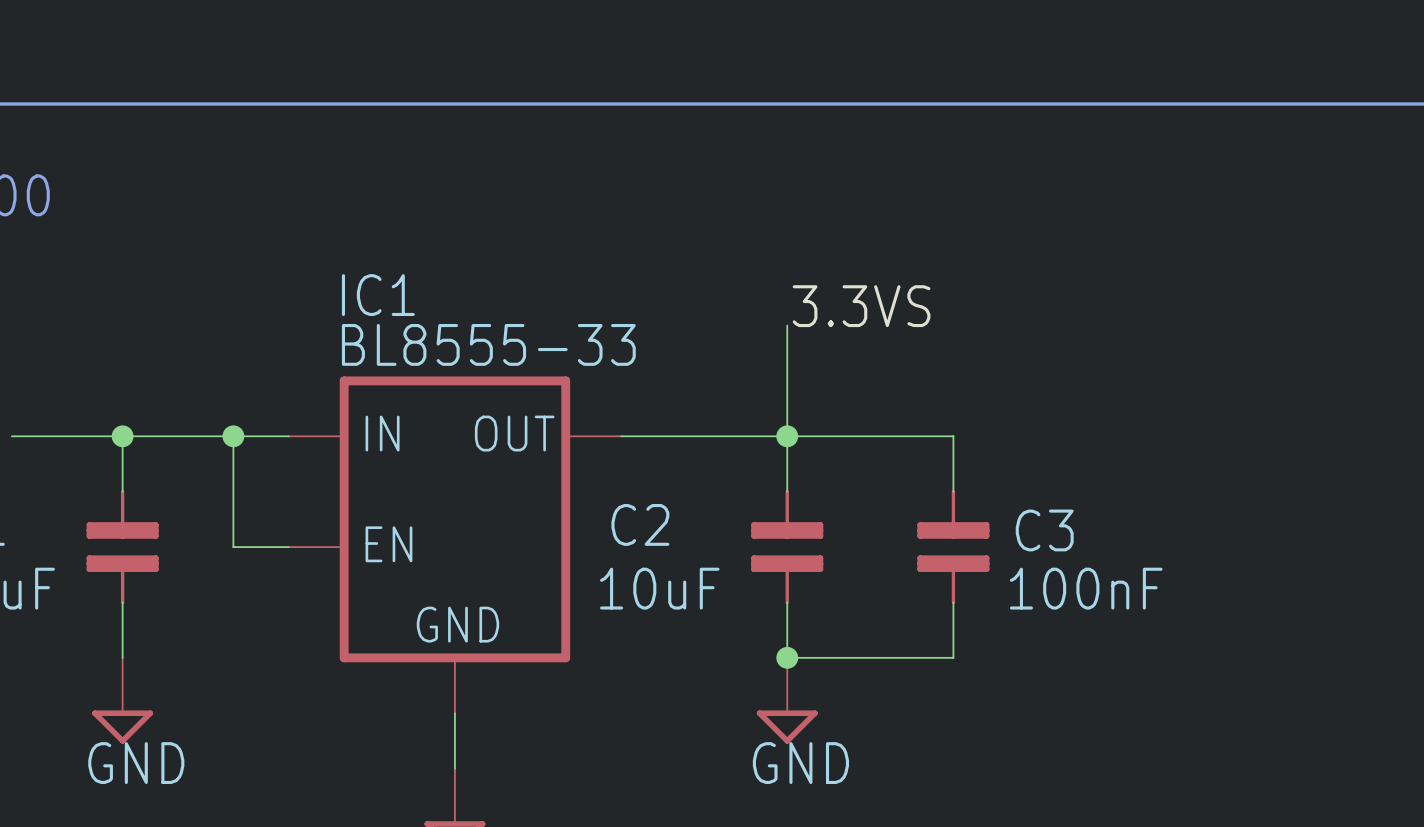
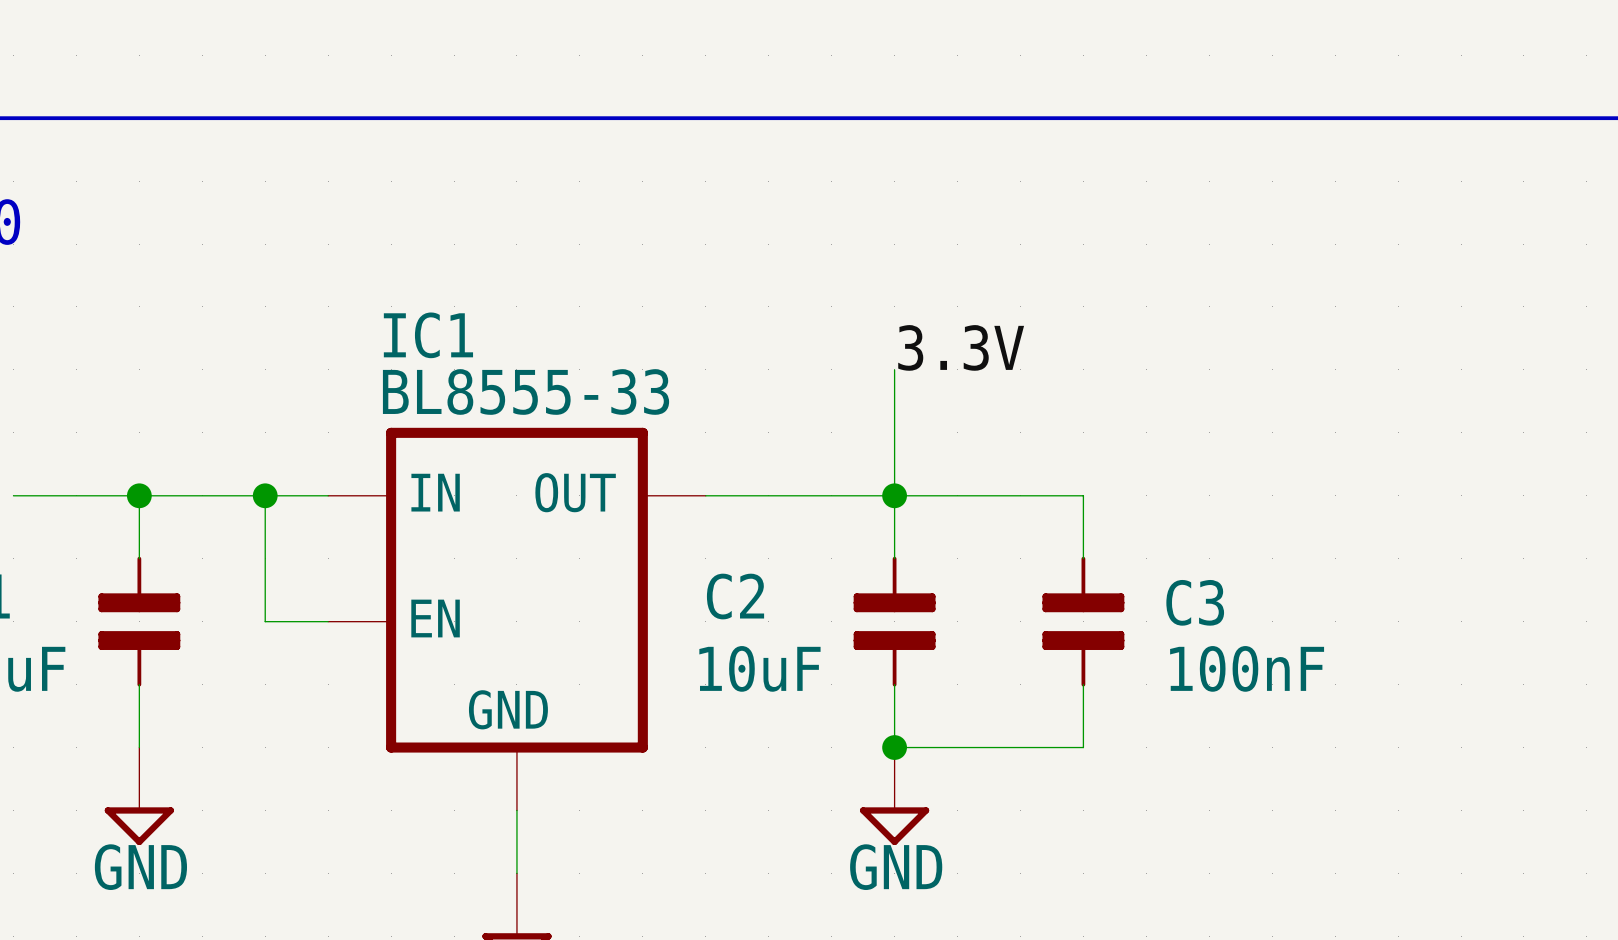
label: 3.3VS (861, 306) -> 3.3V (961, 347)

